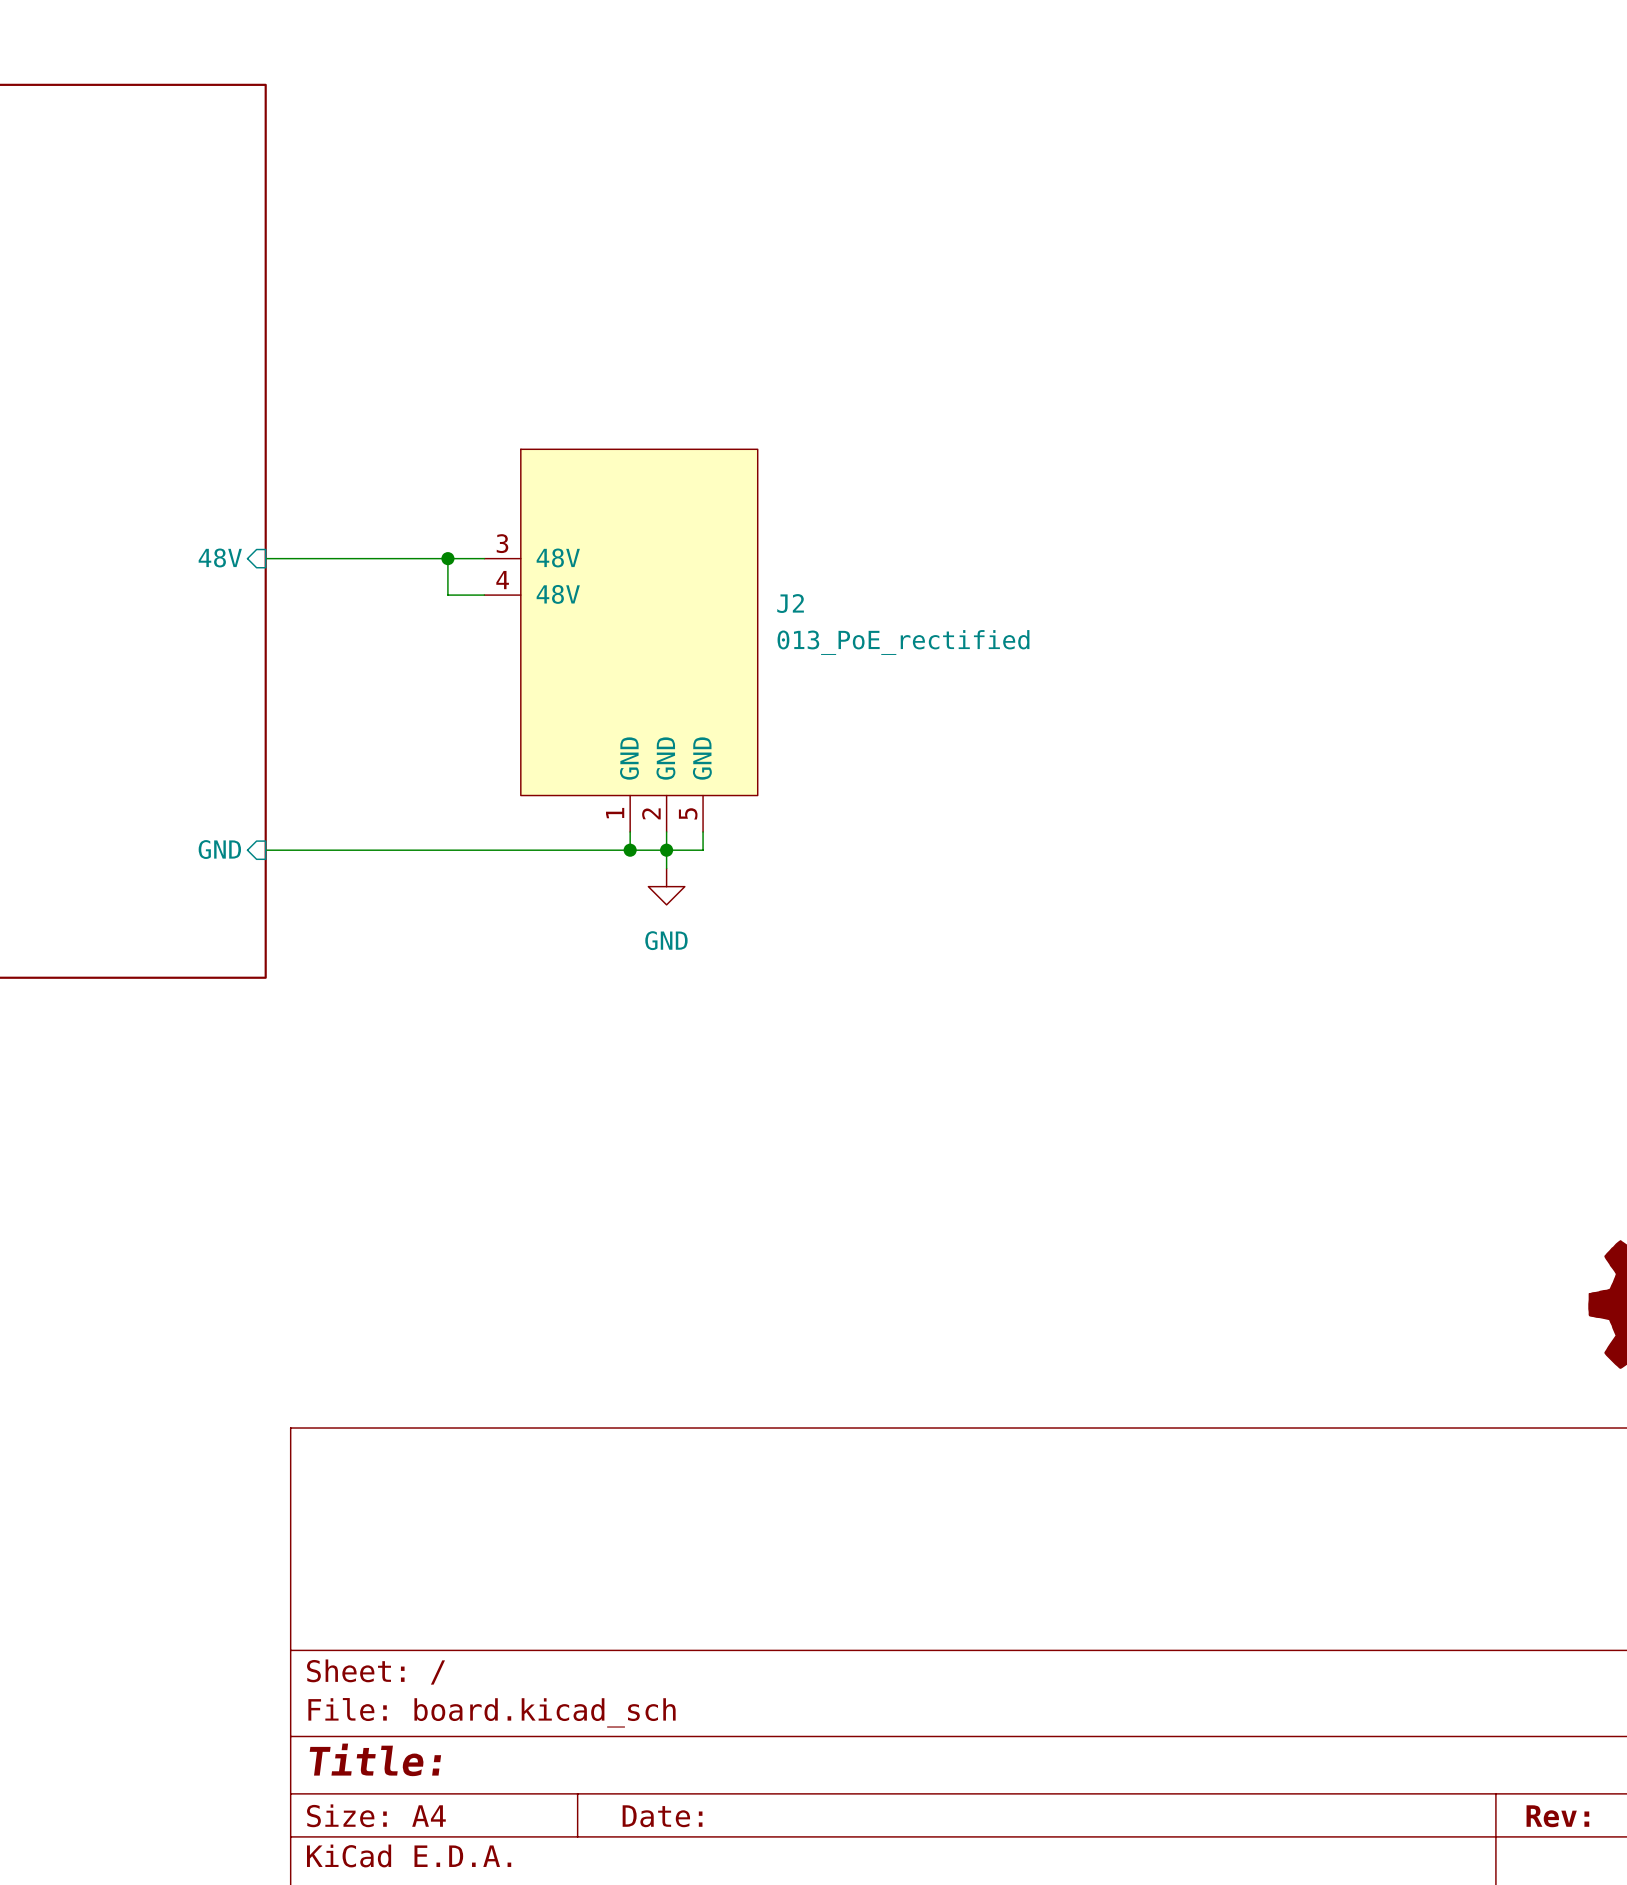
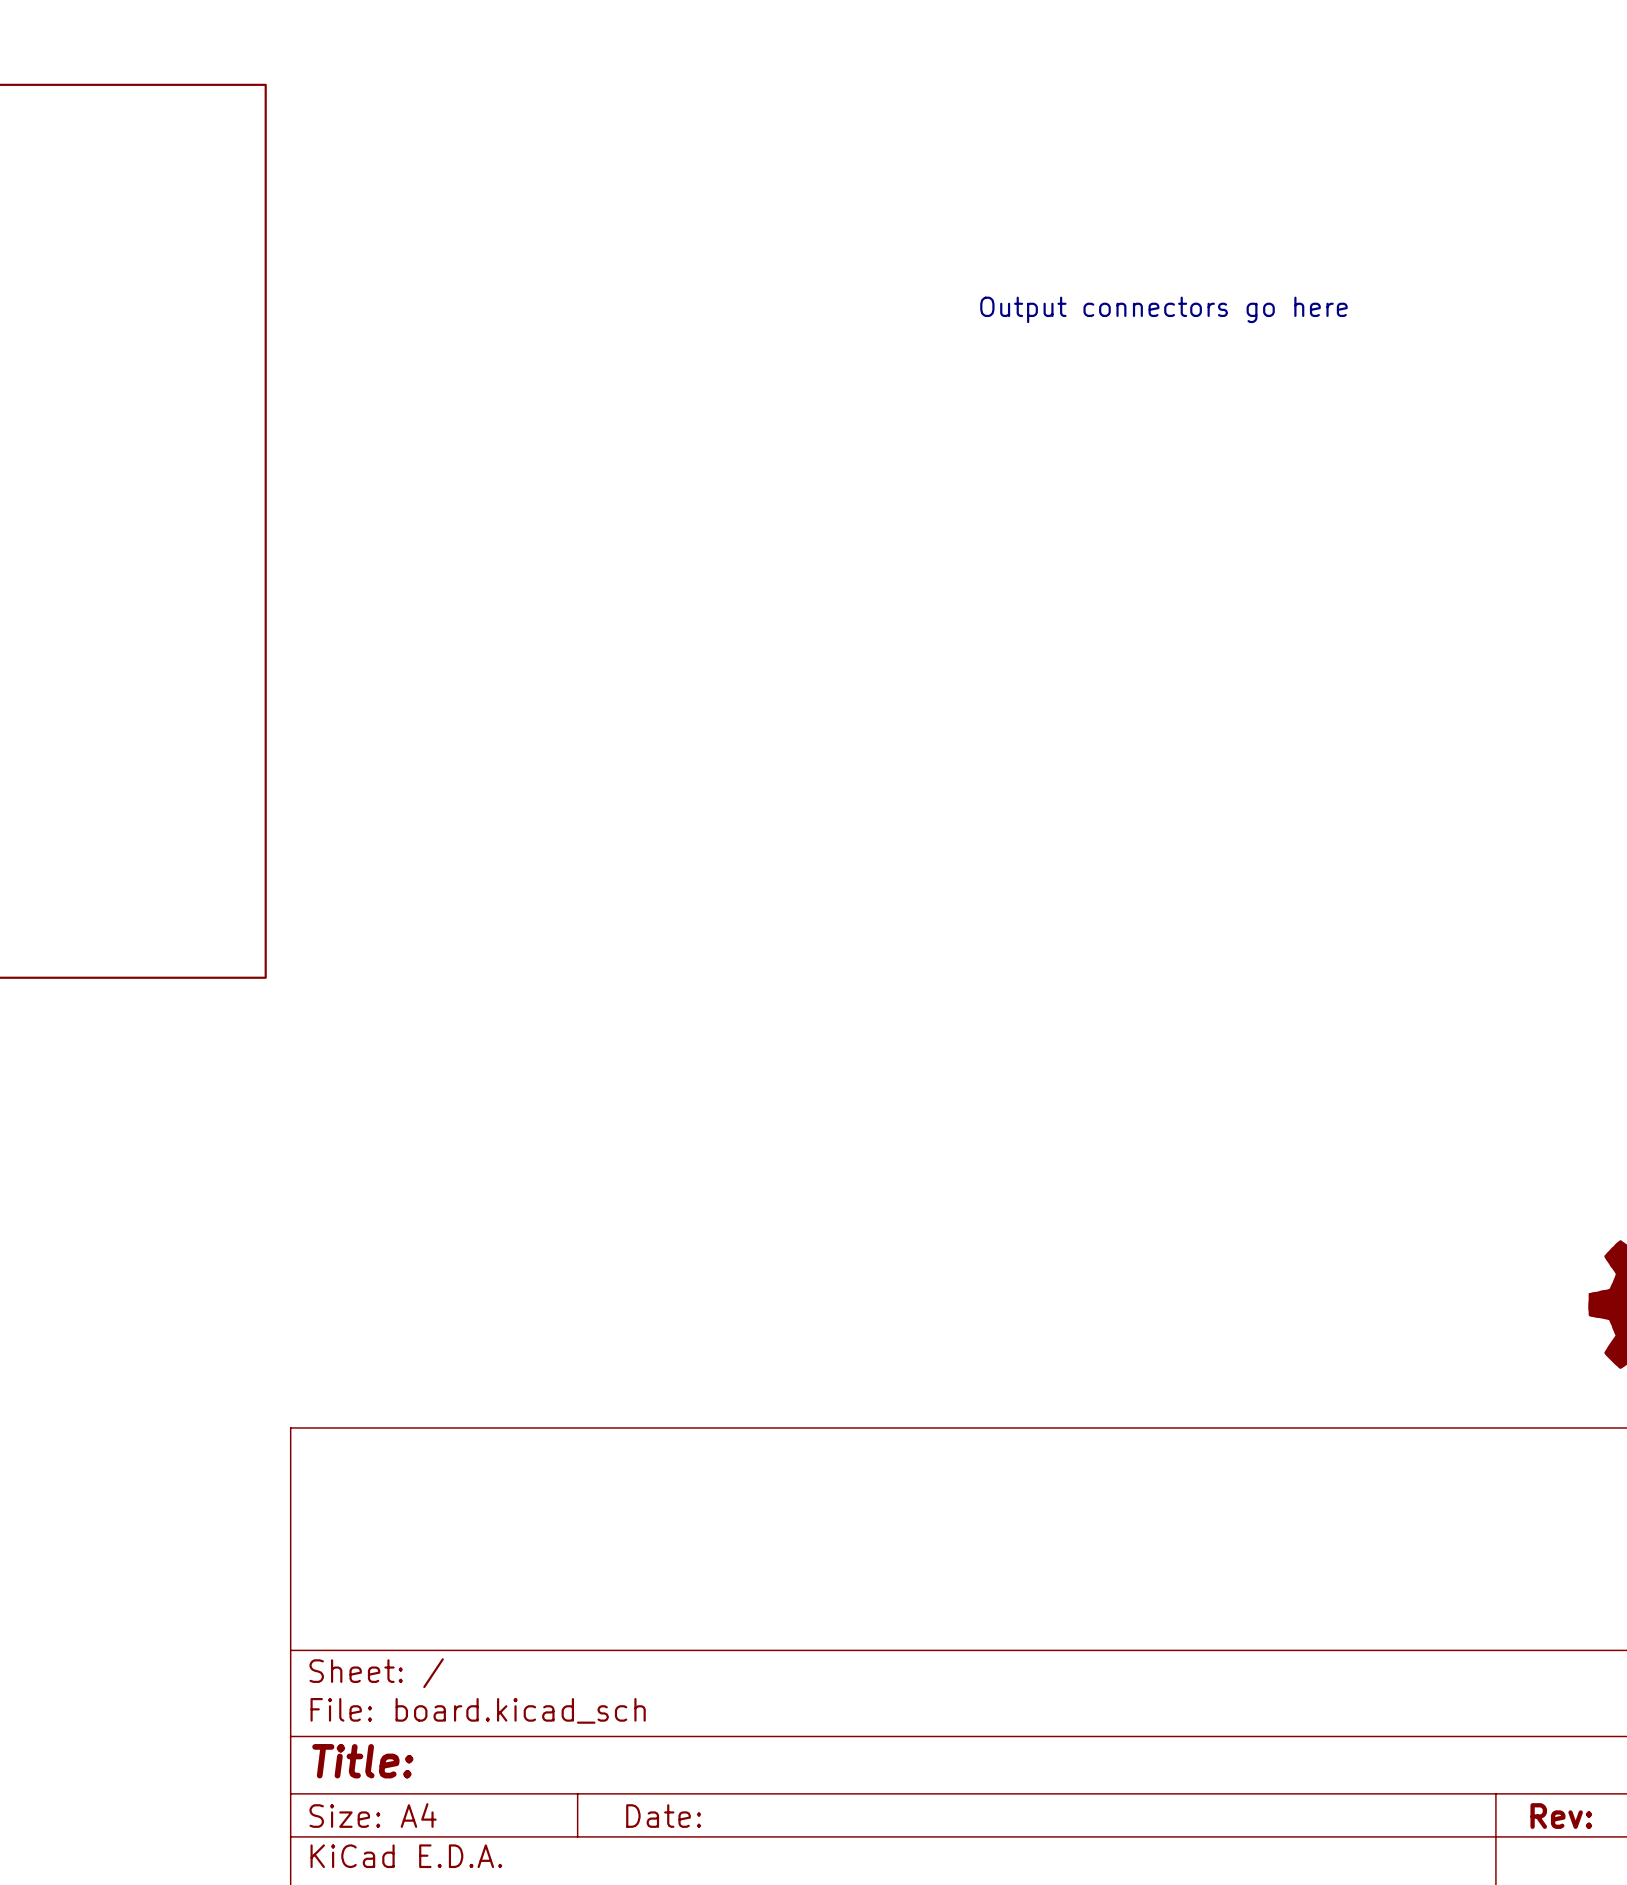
text: none -> Output connectors go here (1163, 309)
sheet pin: 48V (220, 557) -> none
wire: (265, 558) (484, 558) -> none
wire: (447, 558) (447, 595) (484, 595) -> none
junction: (447, 558) -> none
J2: 013_PoE_rectified (621, 640) -> none
wire: (630, 831) (630, 850) -> none
wire: (666, 831) (666, 868) -> none
wire: (703, 831) (703, 850) (265, 850) -> none
sheet pin: GND (219, 849) -> none
junction: (630, 850) -> none
junction: (666, 850) -> none
power symbol: GND (666, 886) -> none

